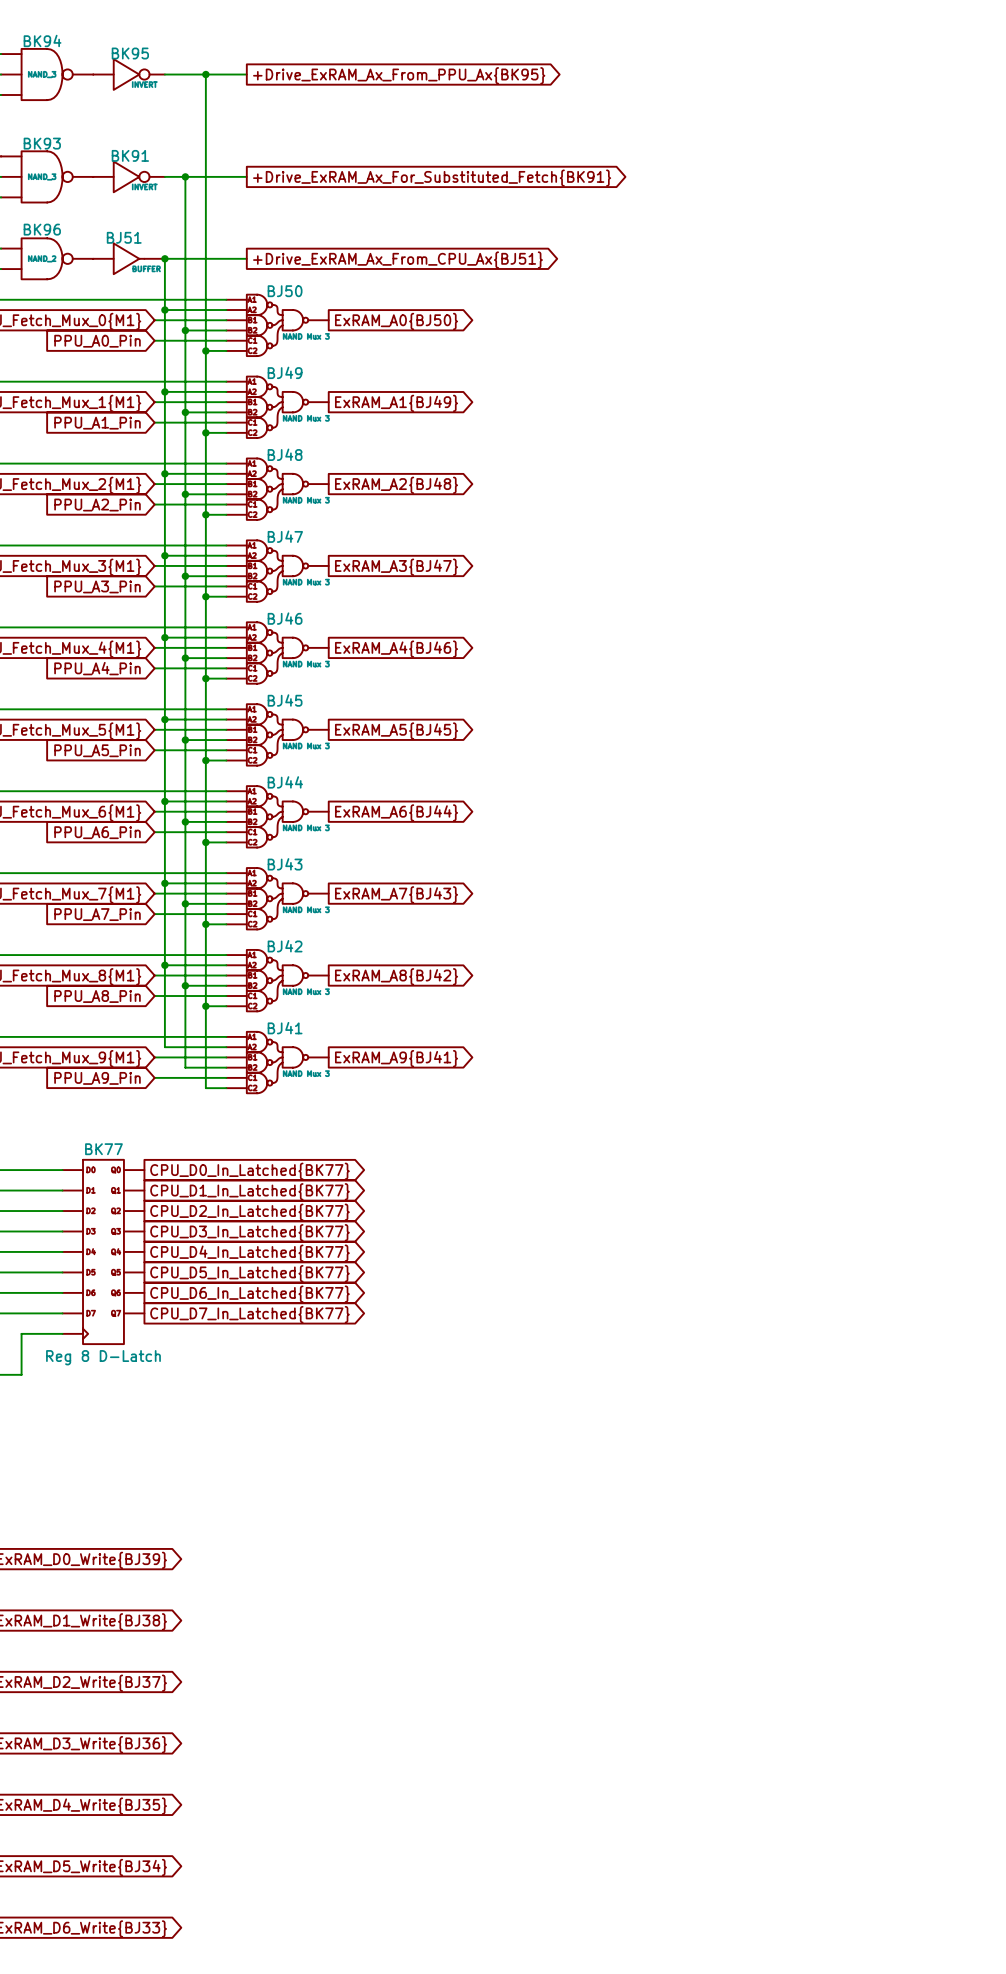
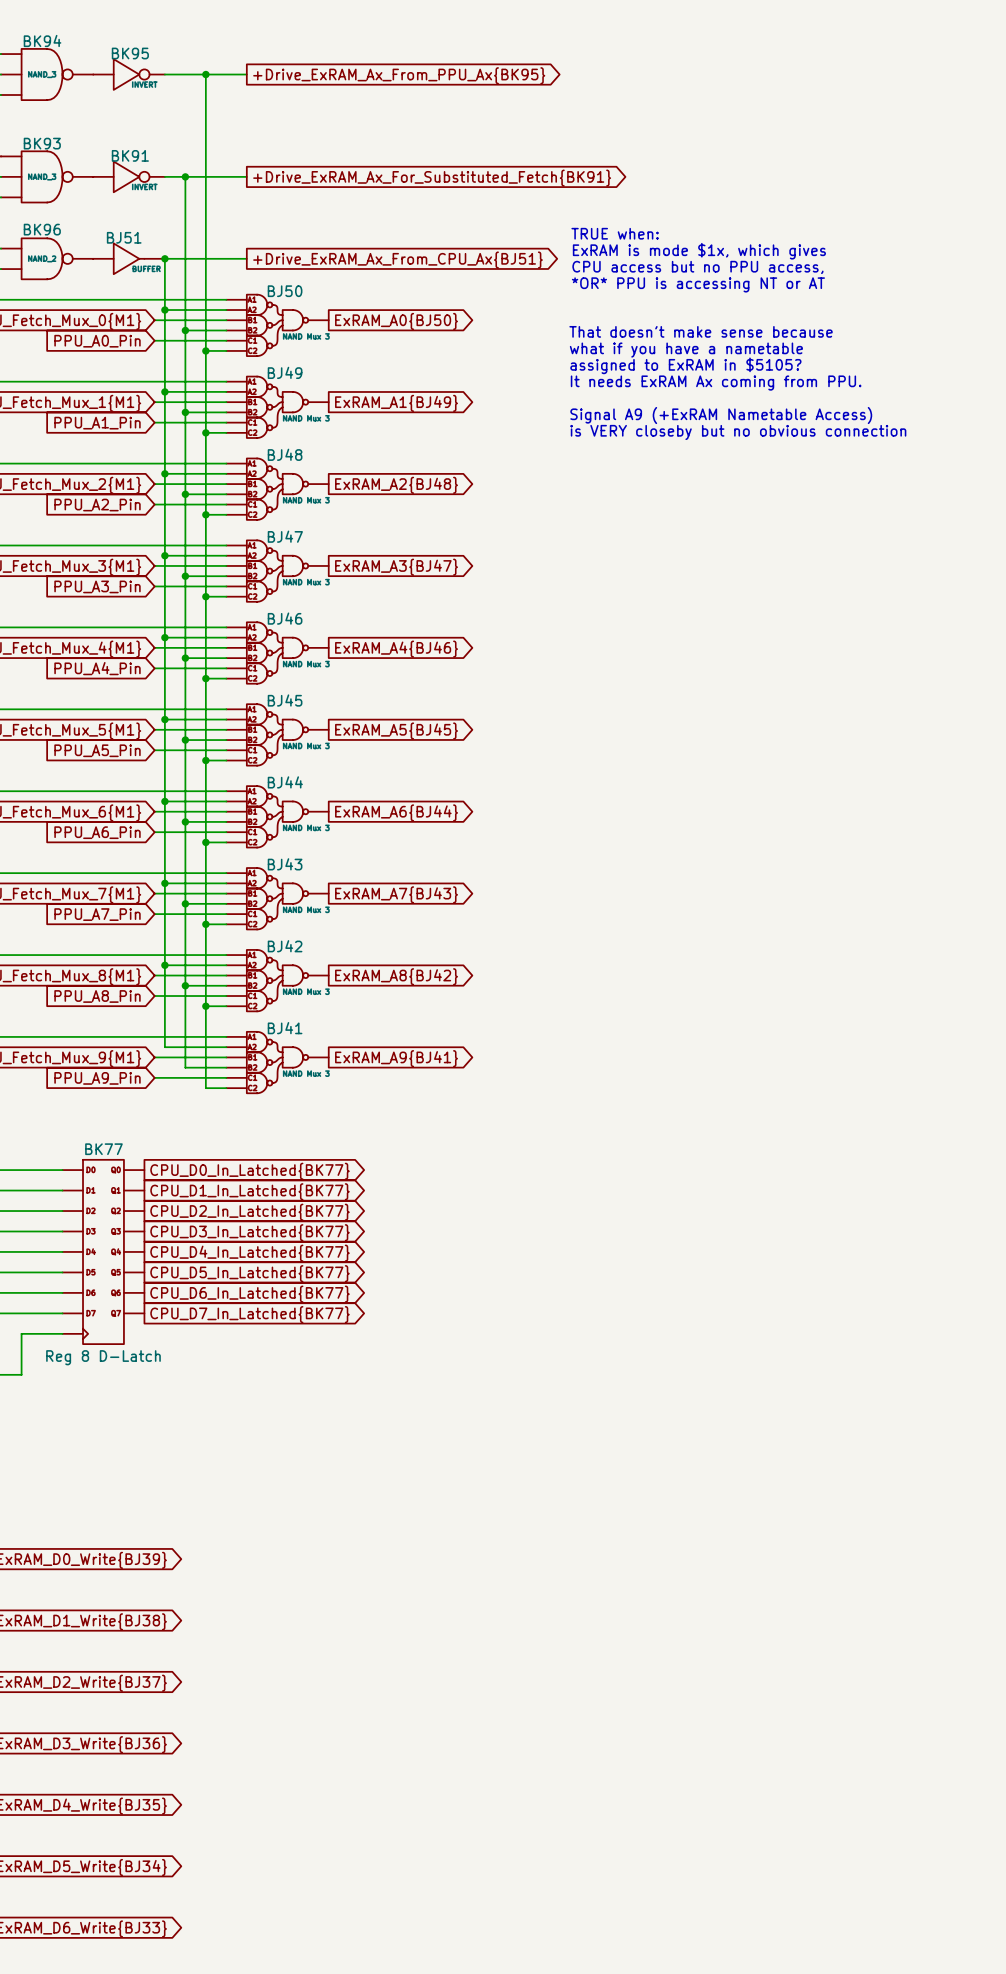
text: none -> TRUE when: (615, 233)
text: none -> ExRAM is mode $1x, which gives (699, 251)
text: none -> CPU access but no PPU access, (697, 267)
text: none -> *OR* PPU is accessing NT or AT (698, 284)
text: none -> That doesn't make sense because (701, 331)
text: none -> what if you have a nametable (686, 350)
text: none -> assigned to ExRAM in $5105? (685, 365)
text: none -> It needs ExRAM Ax coming from PPU. (716, 383)
text: none -> Signal A9 (+ExRAM Nametable Access) (721, 415)
text: none -> is VERY closeby but no obvious connection (738, 432)

